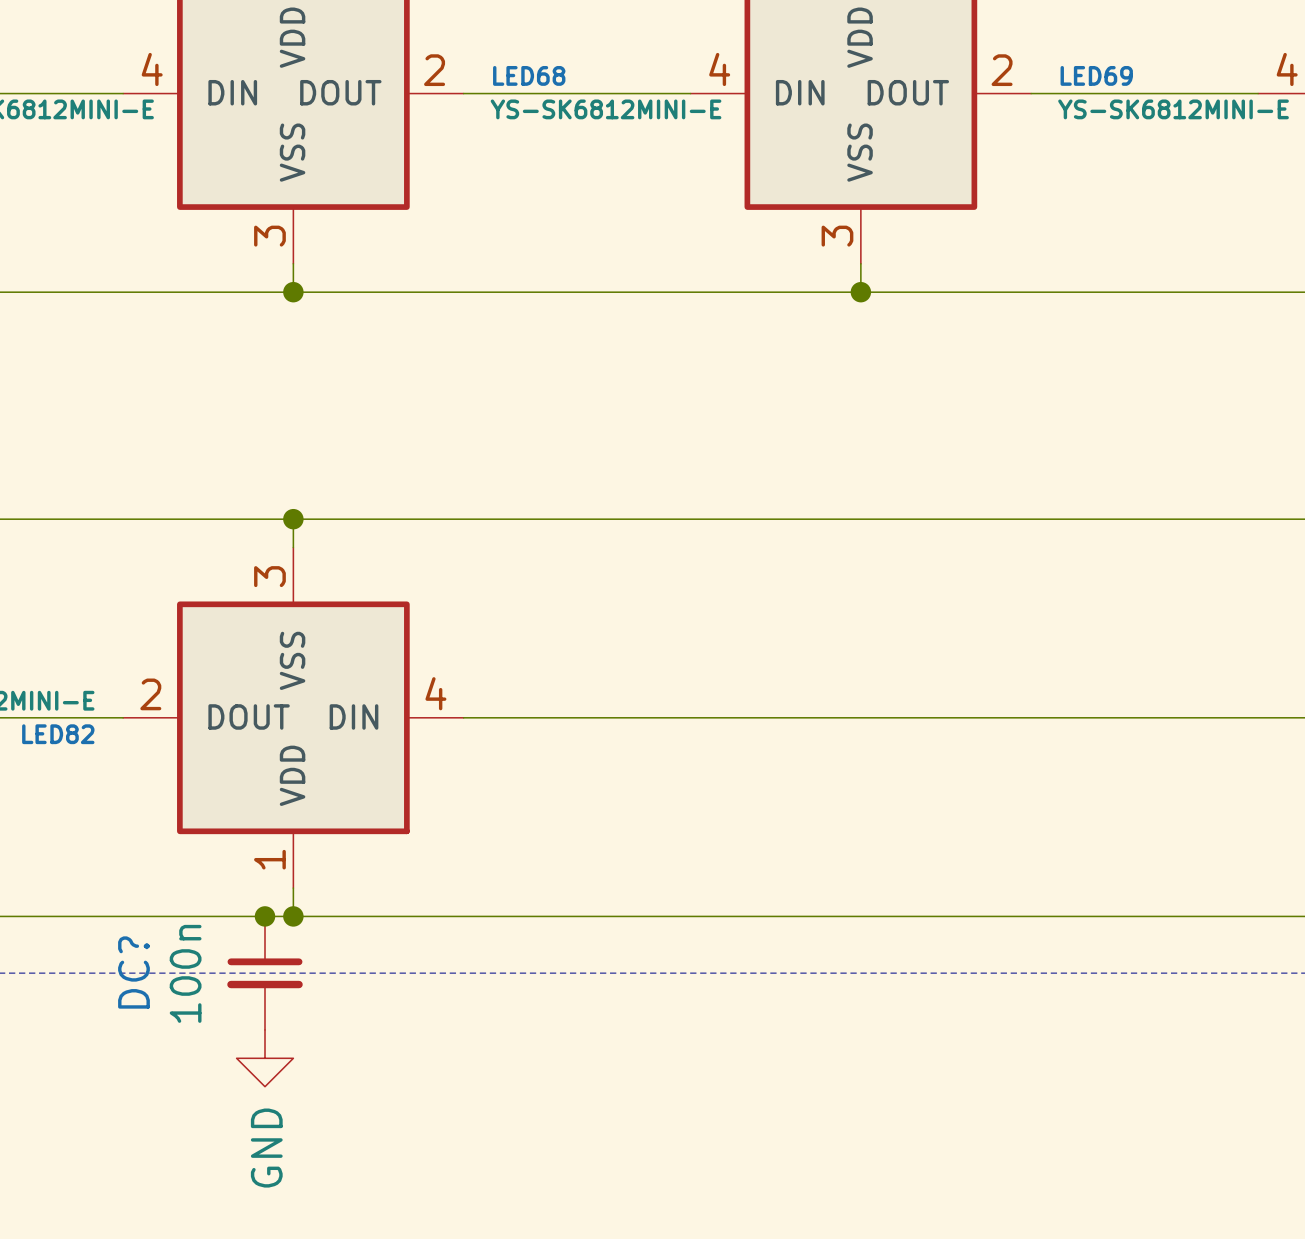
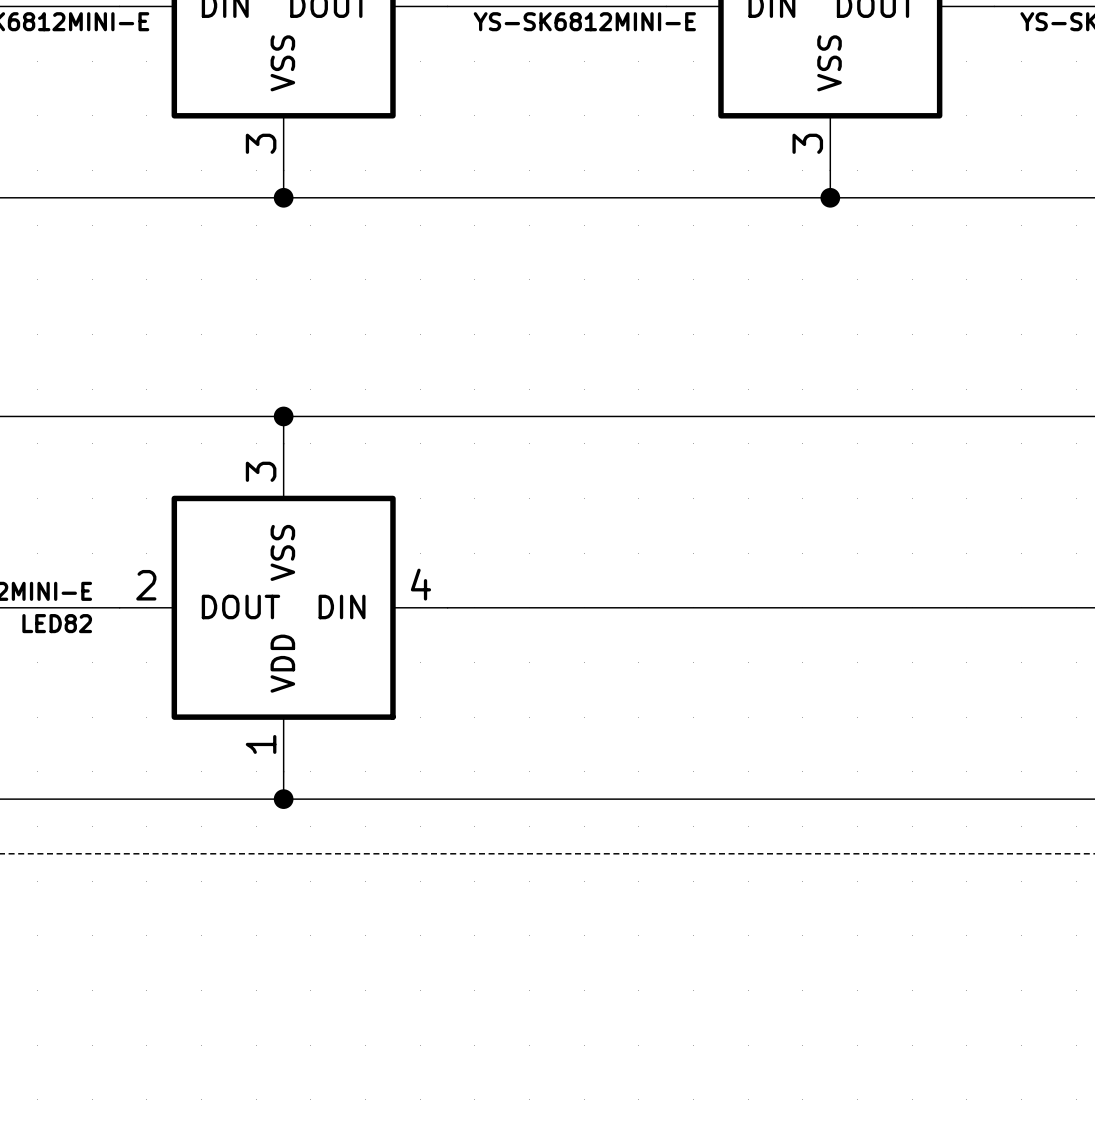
junction: (265, 916) -> none
DC?: 100n (265, 973) -> none
power symbol: GND (265, 1058) -> none

